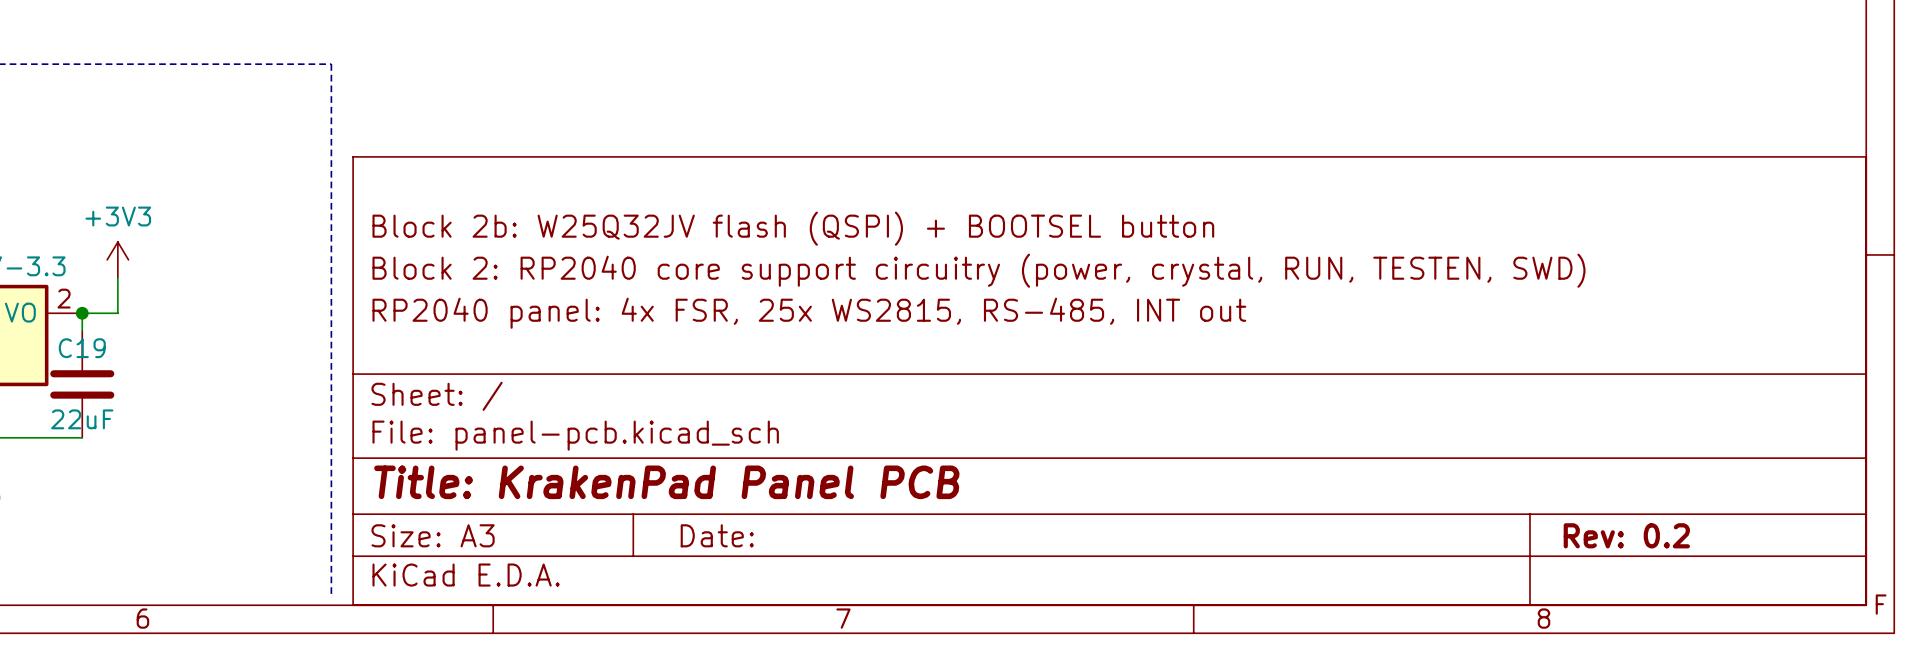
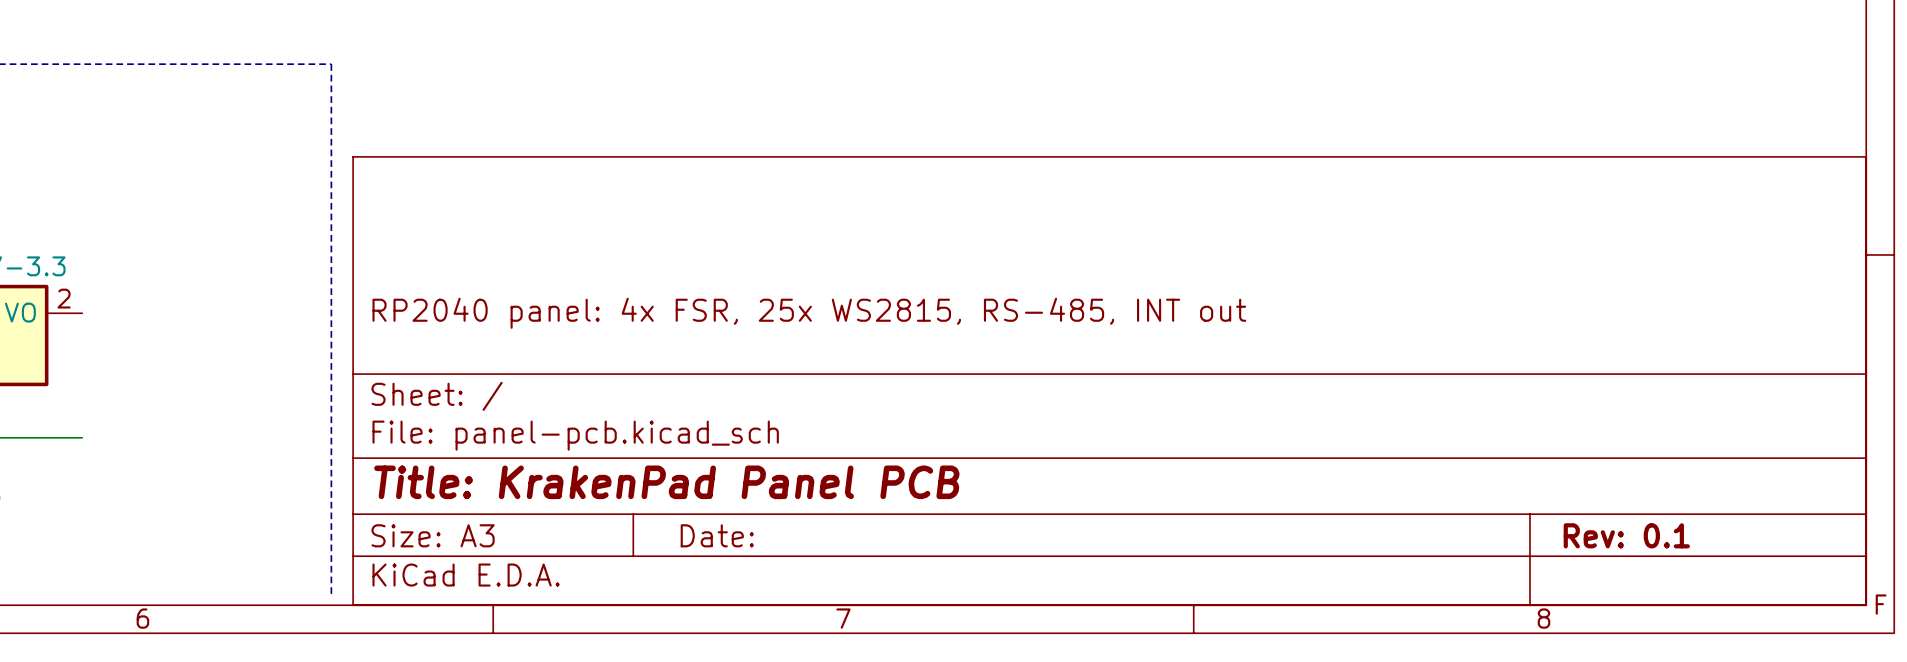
title block: Block 2b: W25Q32JV flash (QSPI) + BOOTSEL button (793, 228) -> none
power symbol: +3V3 (117, 259) -> none
title block: Block 2: RP2040 core support circuitry (power, crystal, RUN, TESTEN, SWD) (978, 270) -> none
wire: (117, 277) (117, 313) (82, 313) (82, 331) -> none
junction: (82, 313) -> none
C19: 22uF (82, 384) -> none
title block: Rev: 0.2 (1626, 535) -> Rev: 0.1 (1626, 535)

